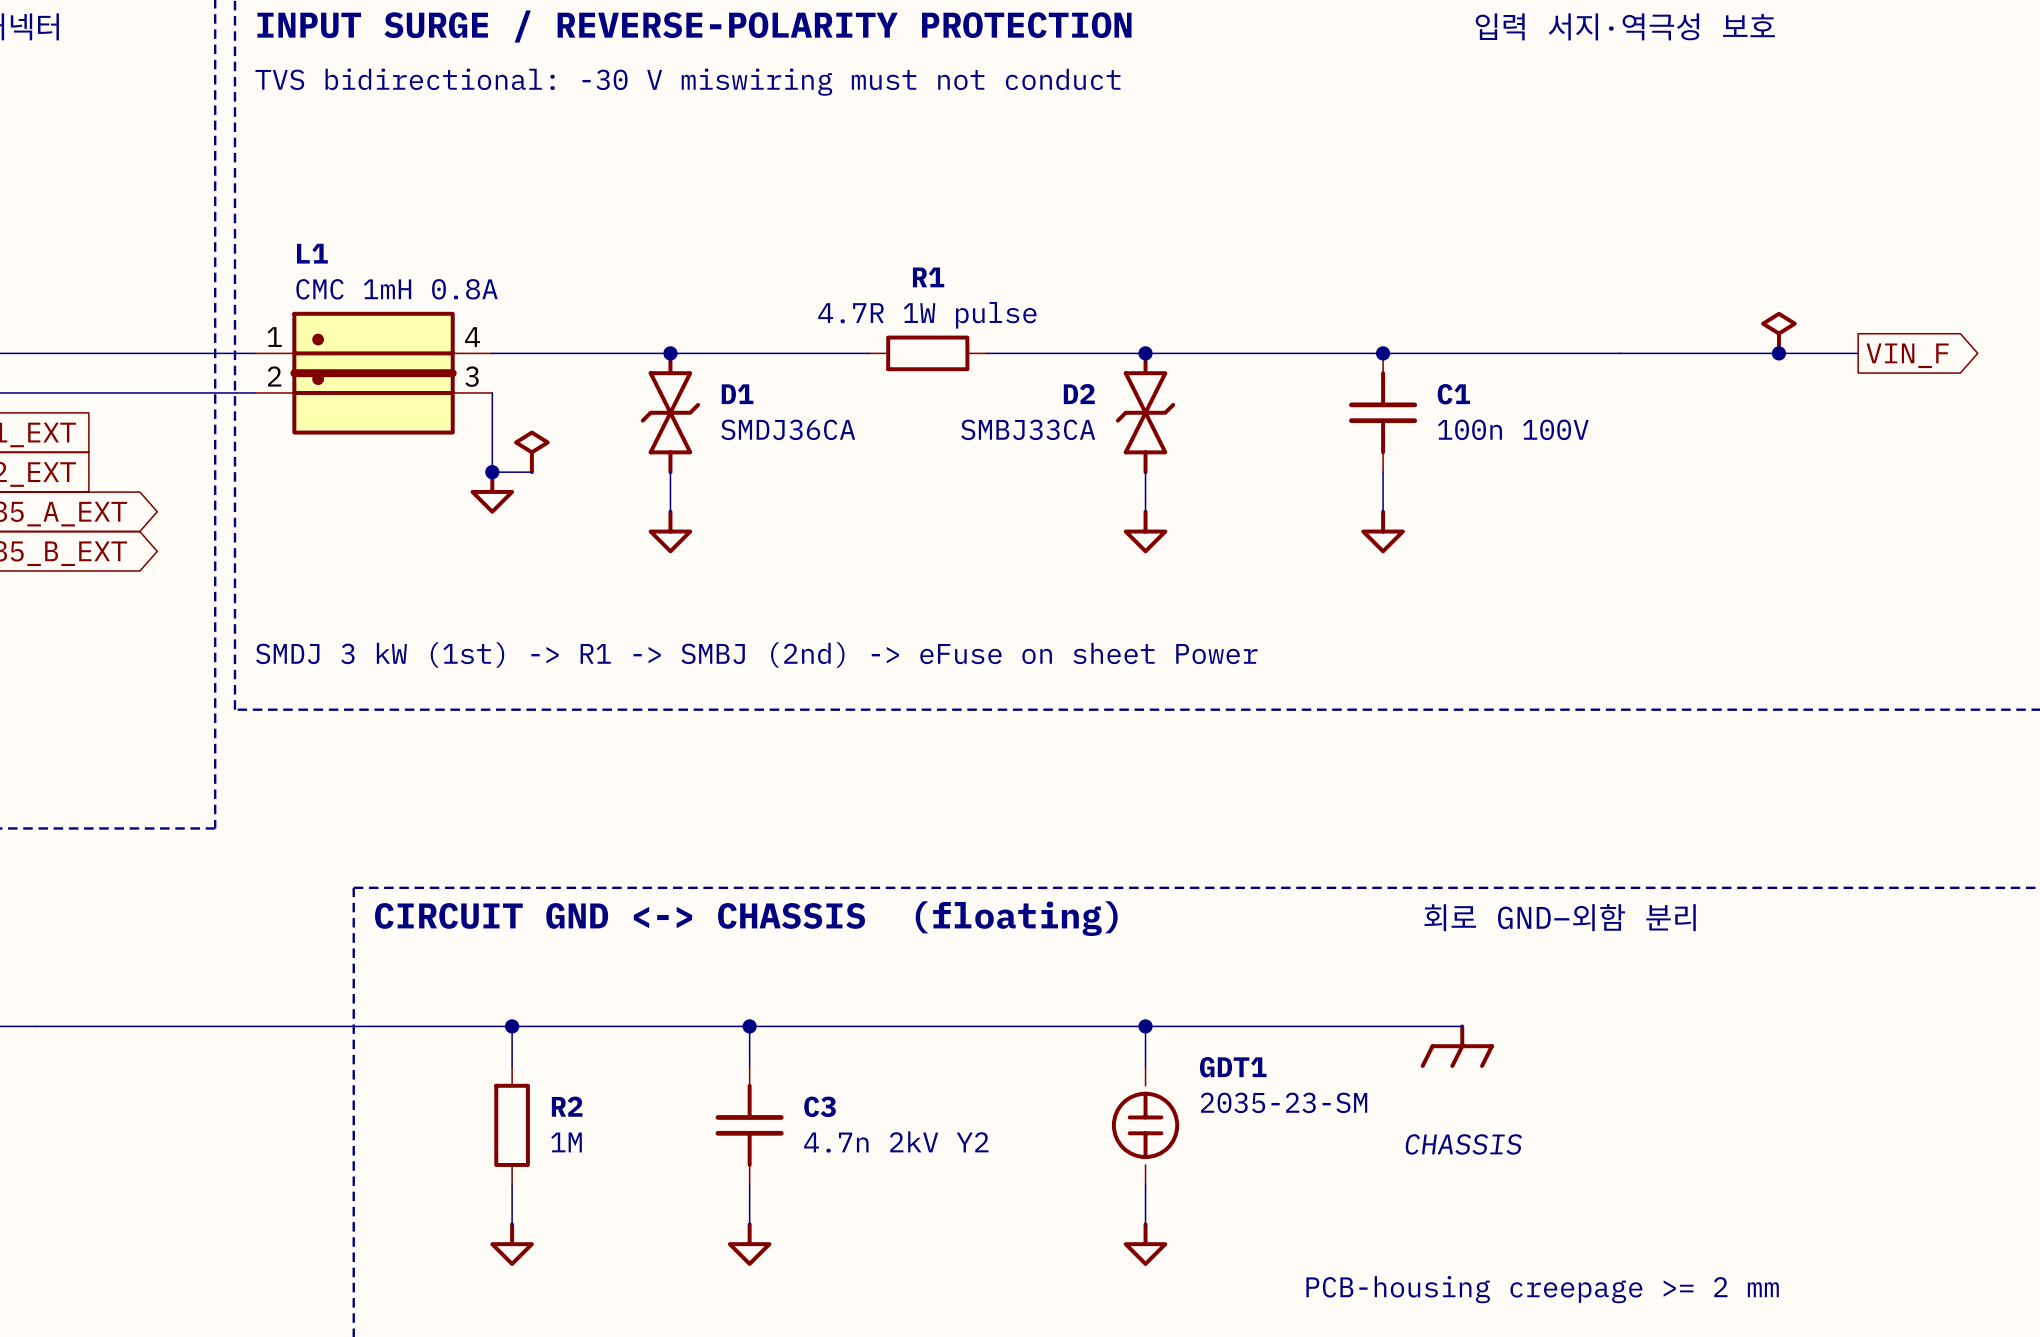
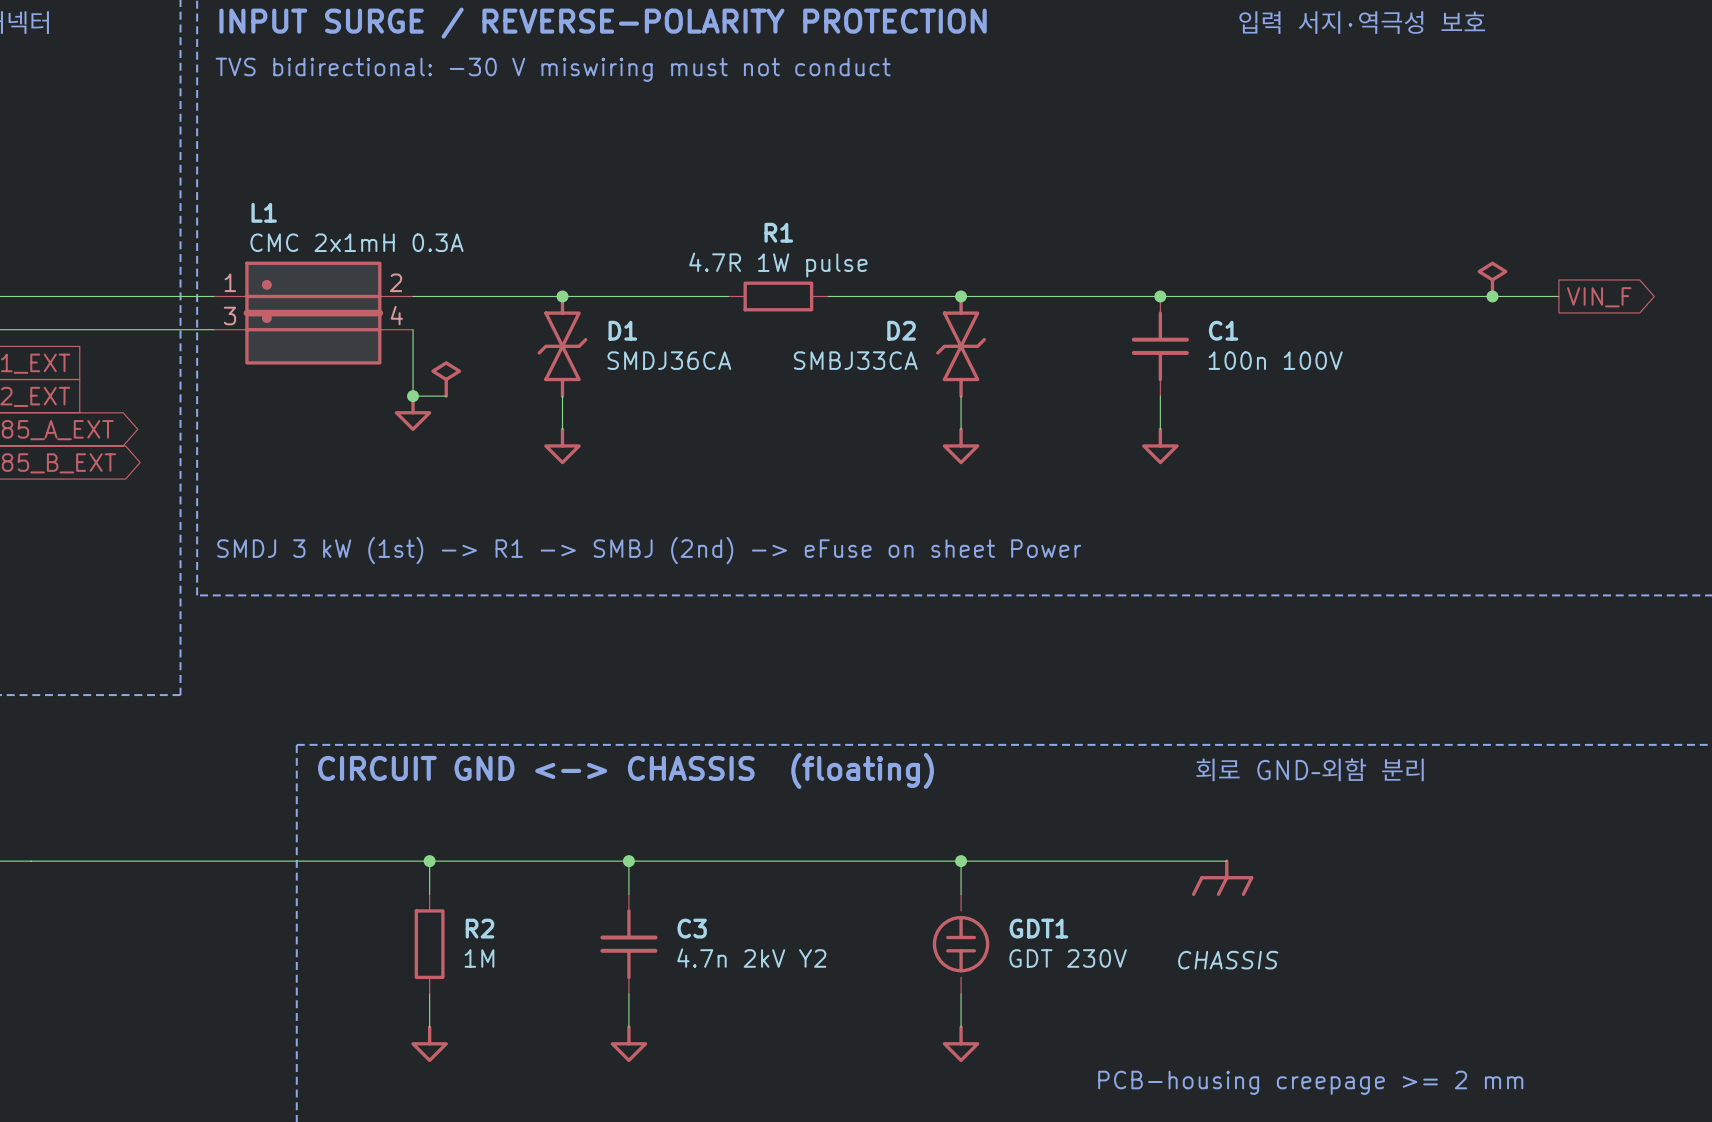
L1 value: CMC 1mH 0.8A (397, 289) -> CMC 2x1mH 0.3A (357, 242)
L1 pin number: 4 (472, 337) -> 2 (396, 282)
L1 pin number: 2 (274, 376) -> 3 (229, 316)
L1 pin number: 3 (472, 376) -> 4 (396, 315)
GDT1 name position: GDT1 (1233, 1067) -> GDT1 (1038, 928)
GDT1 value: 2035-23-SM (1284, 1102) -> GDT 230V (1068, 958)

